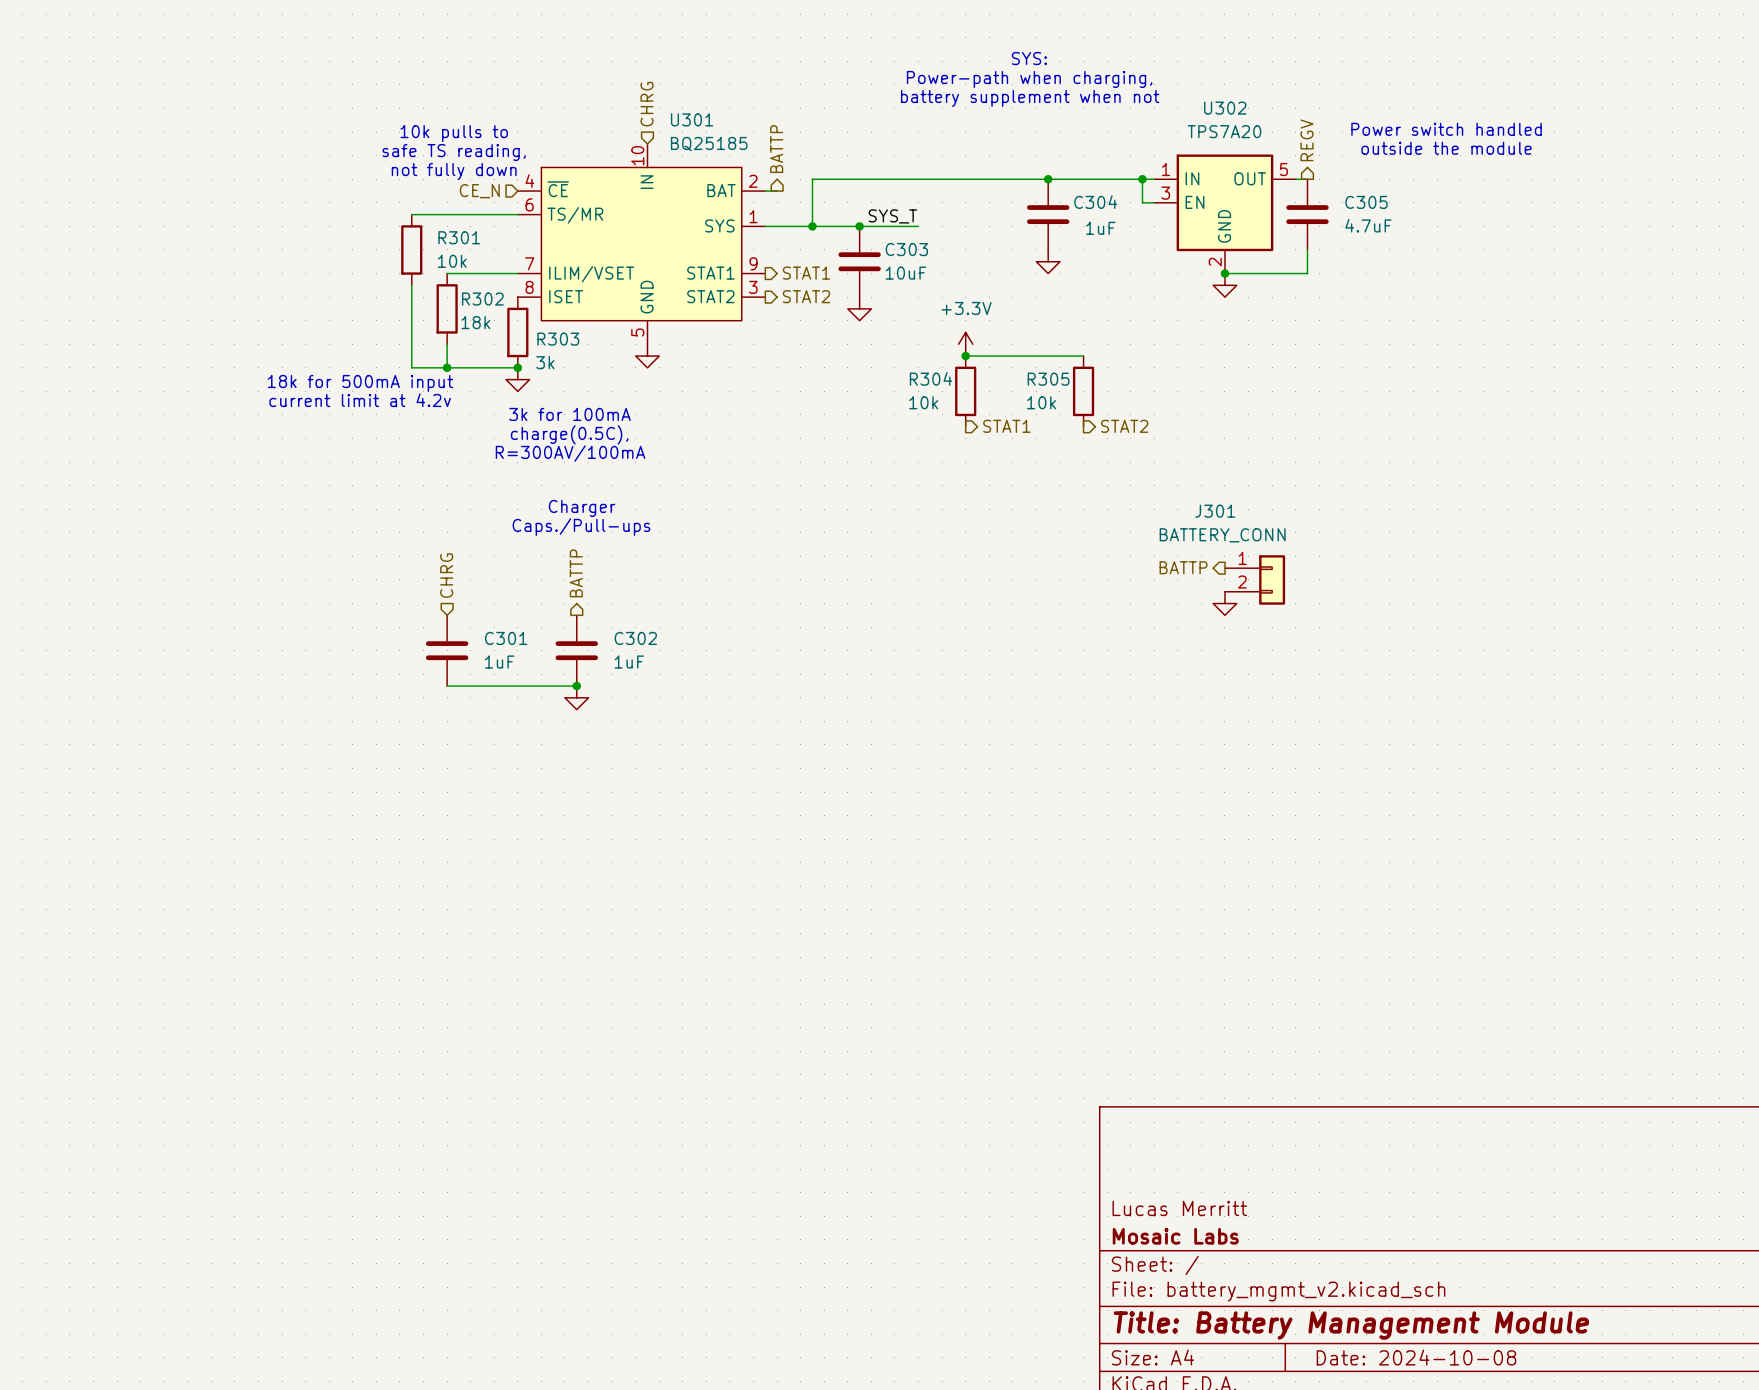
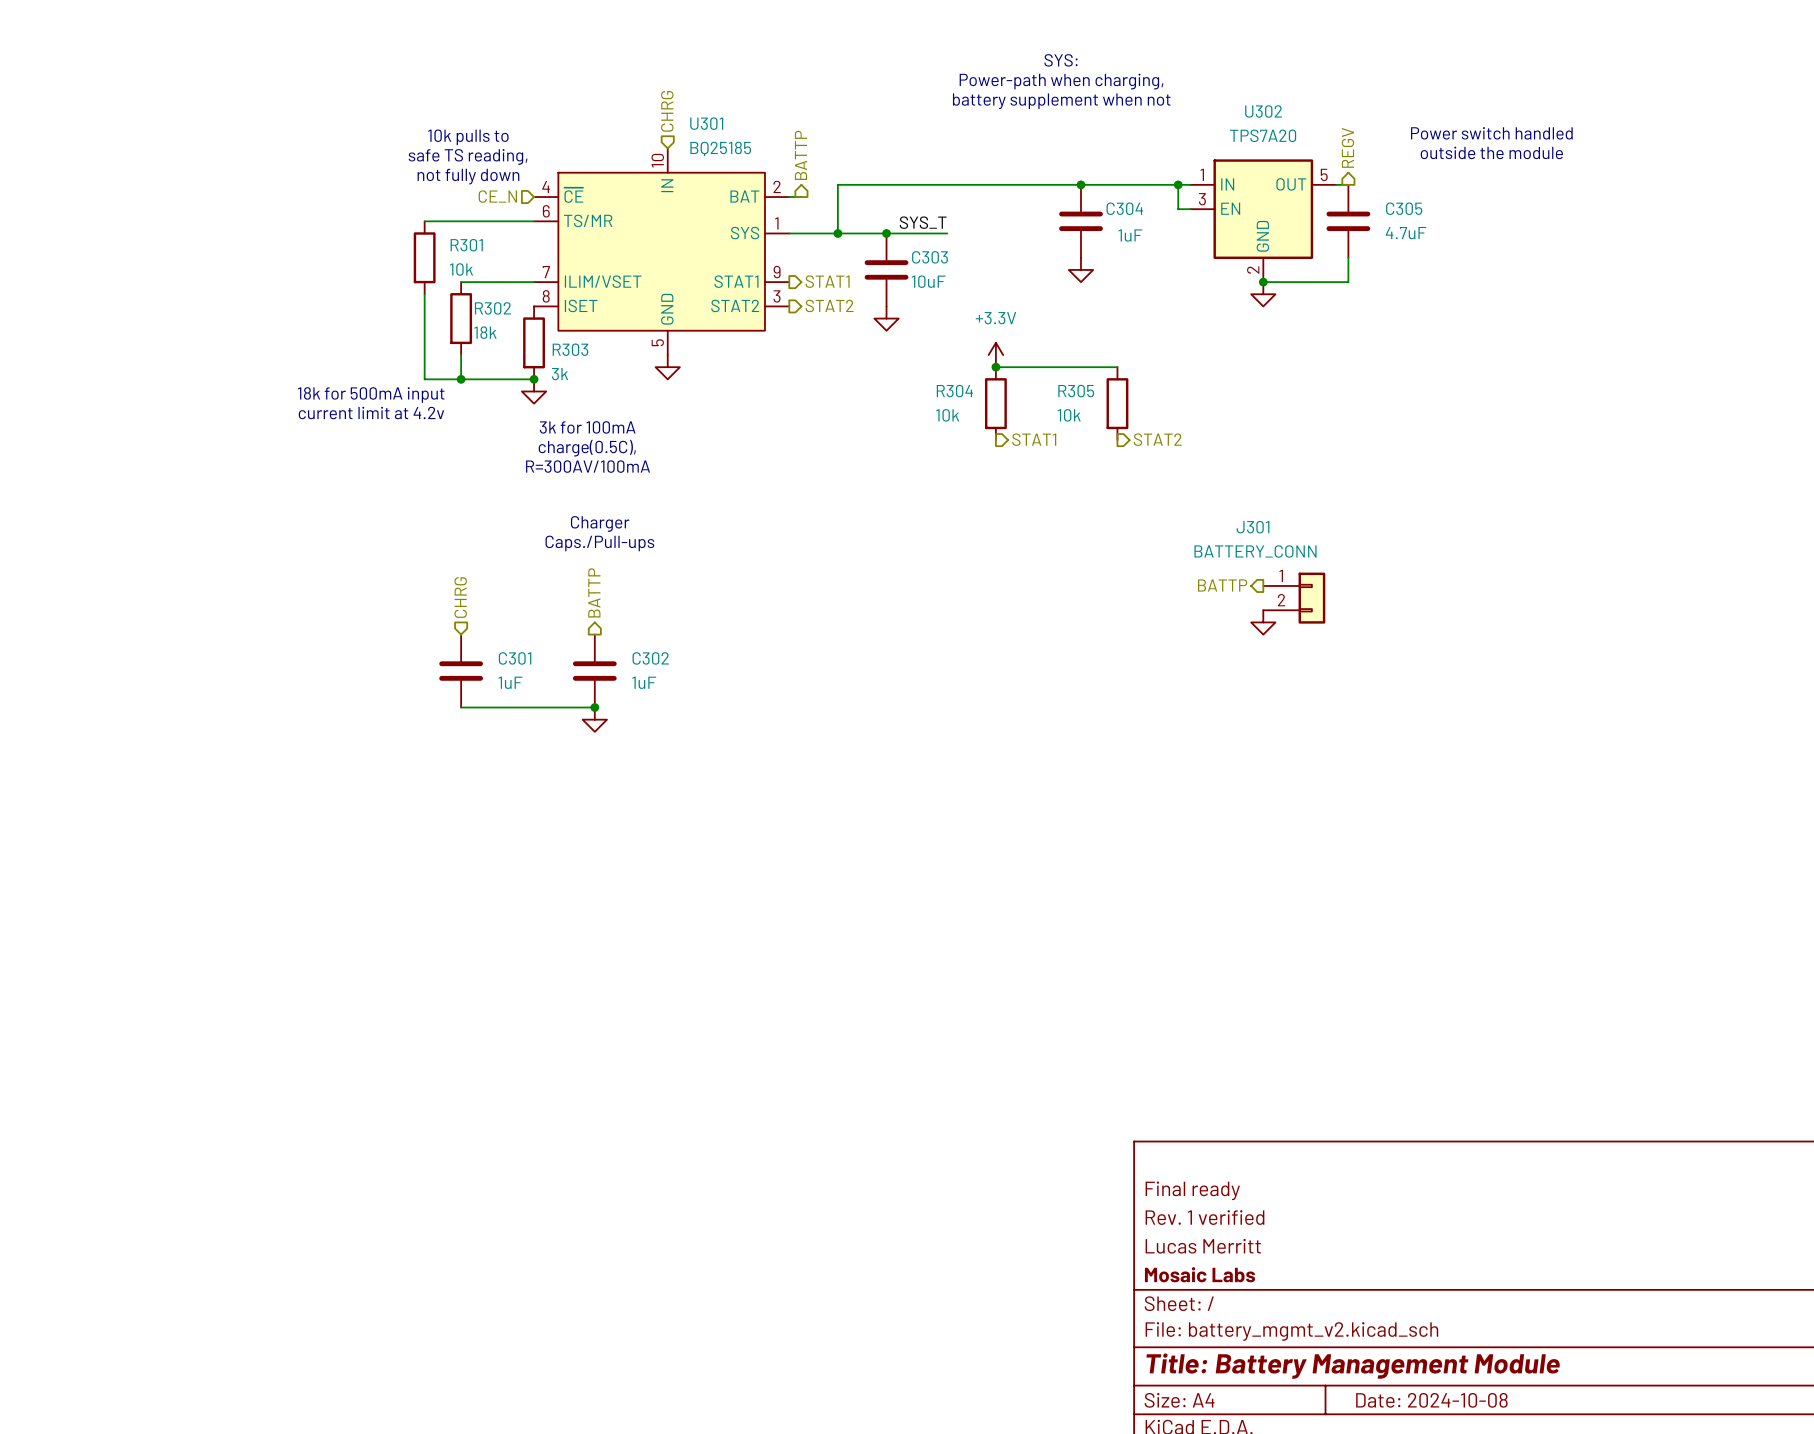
title block: none -> Final ready (1192, 1190)
title block: none -> Rev. 1 verified (1204, 1217)

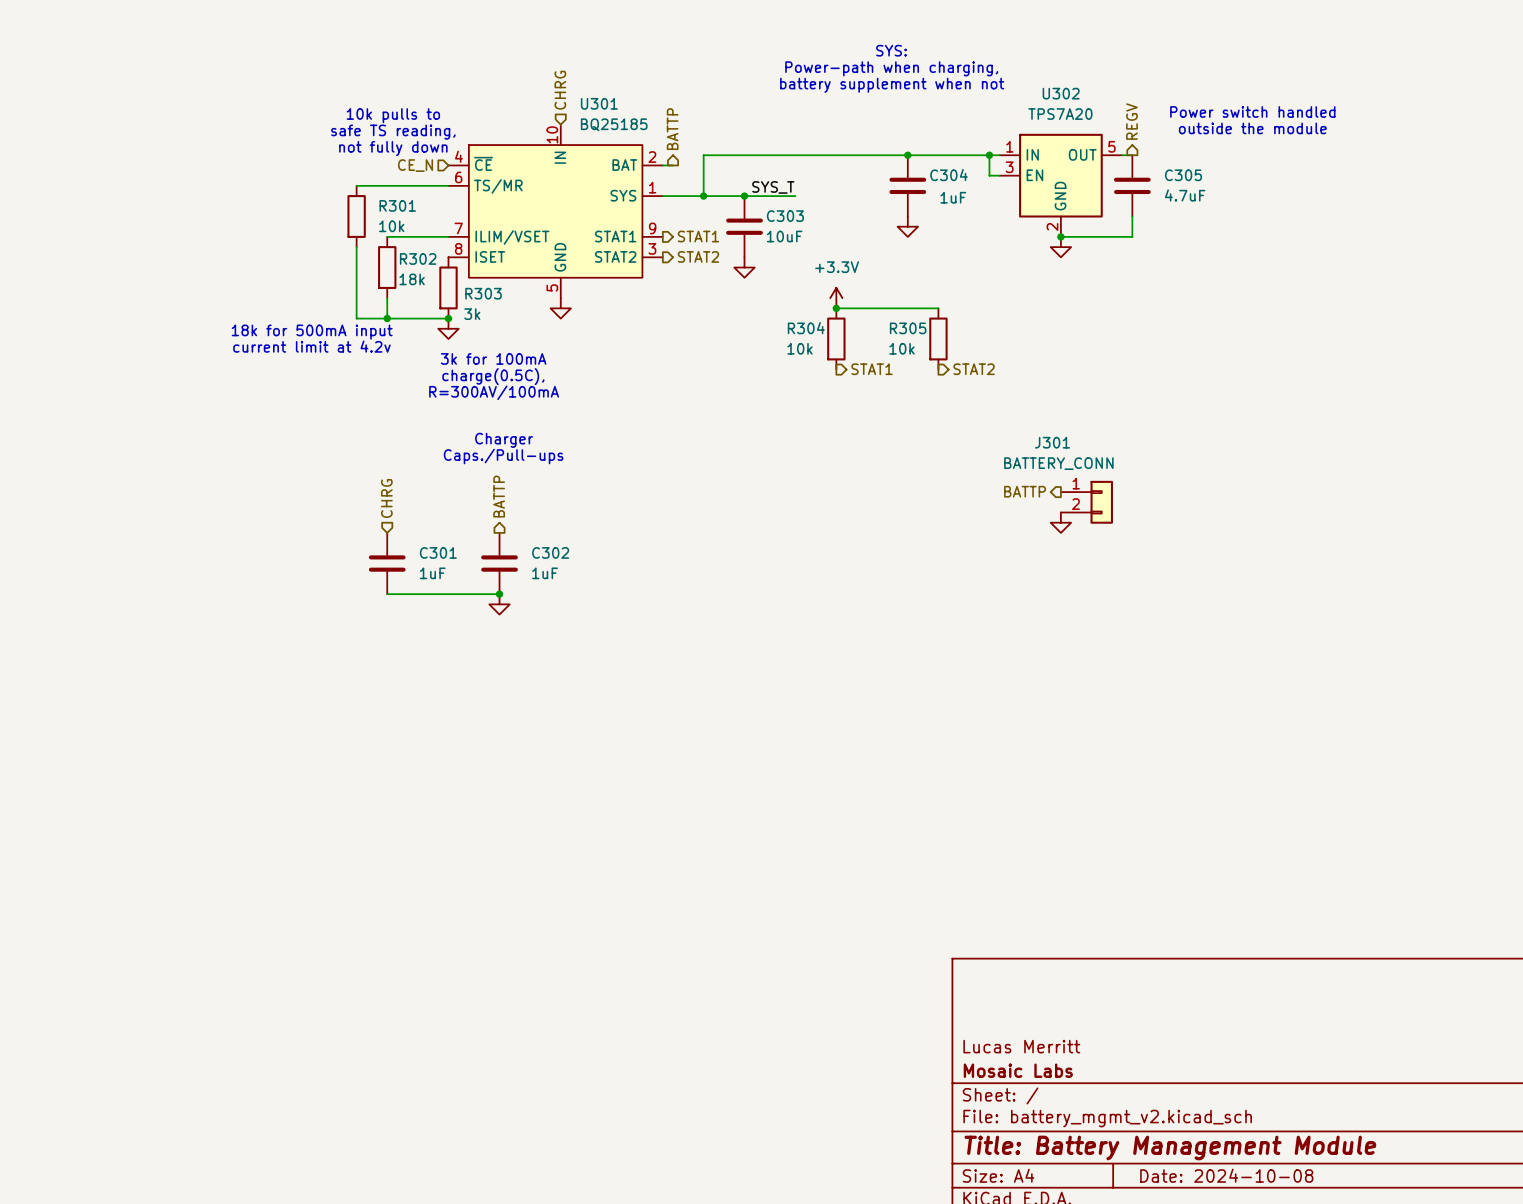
title block: Final ready (1192, 1190) -> none
title block: Rev. 1 verified (1204, 1217) -> none

